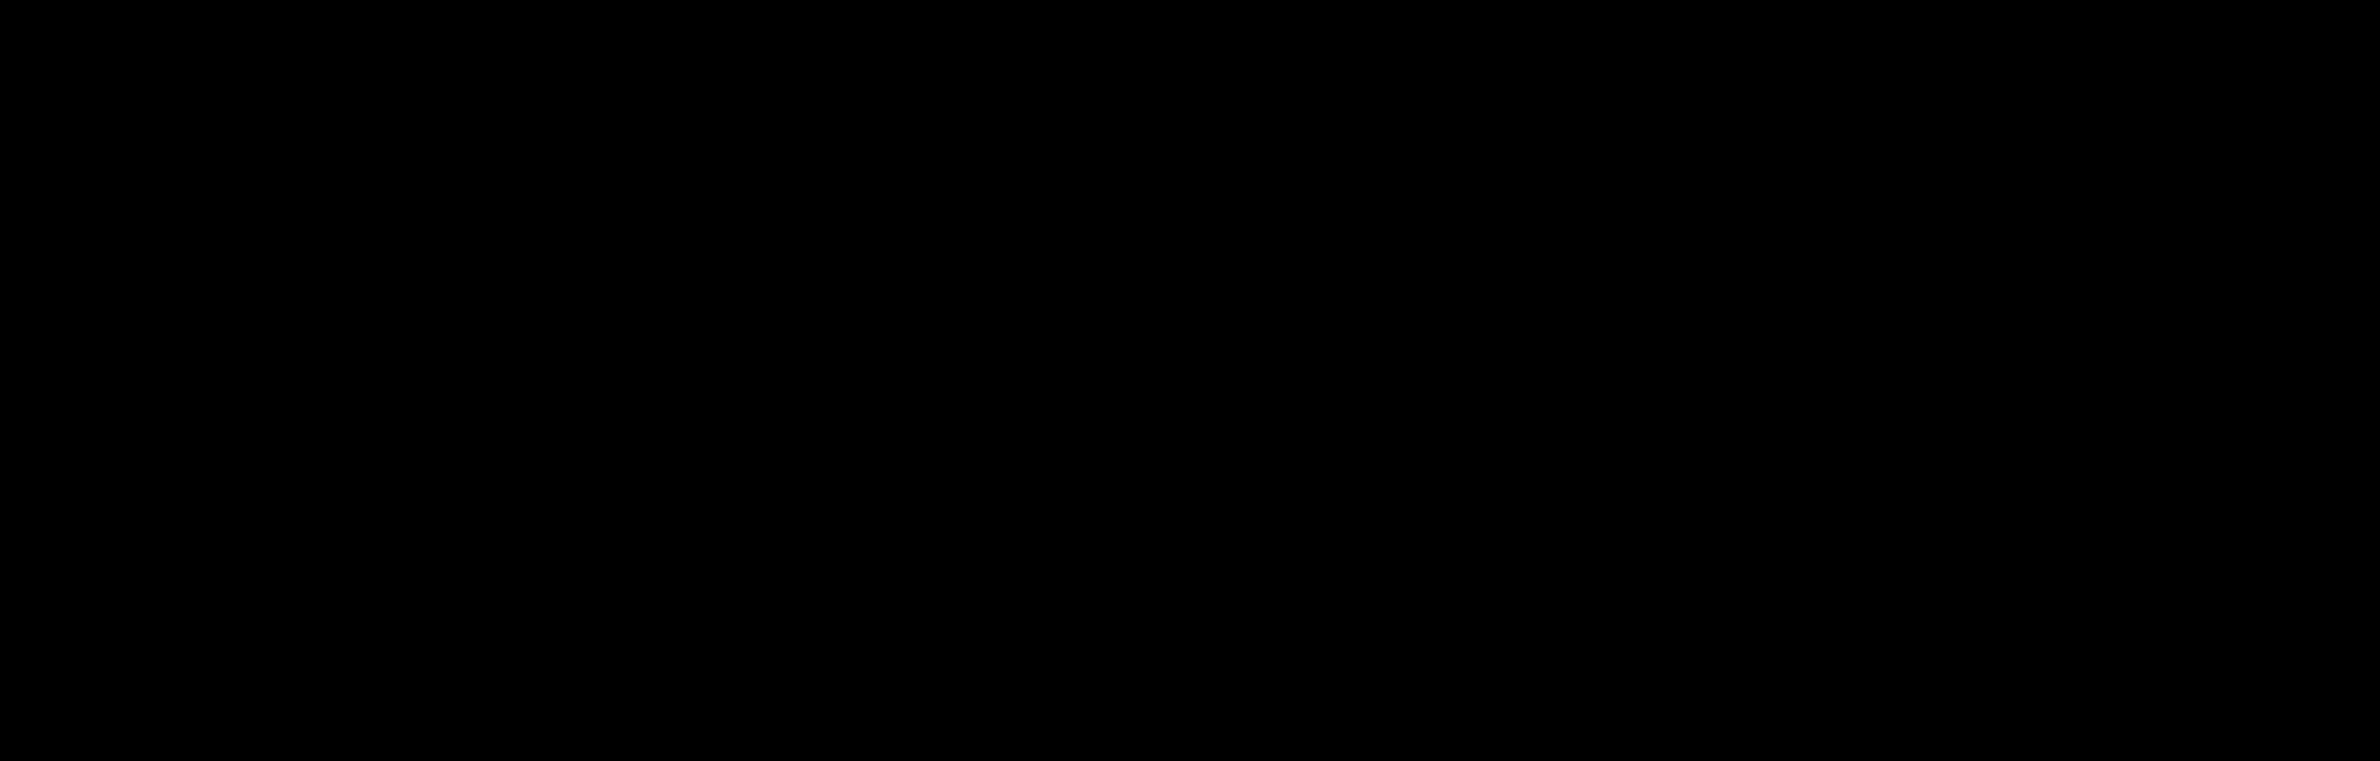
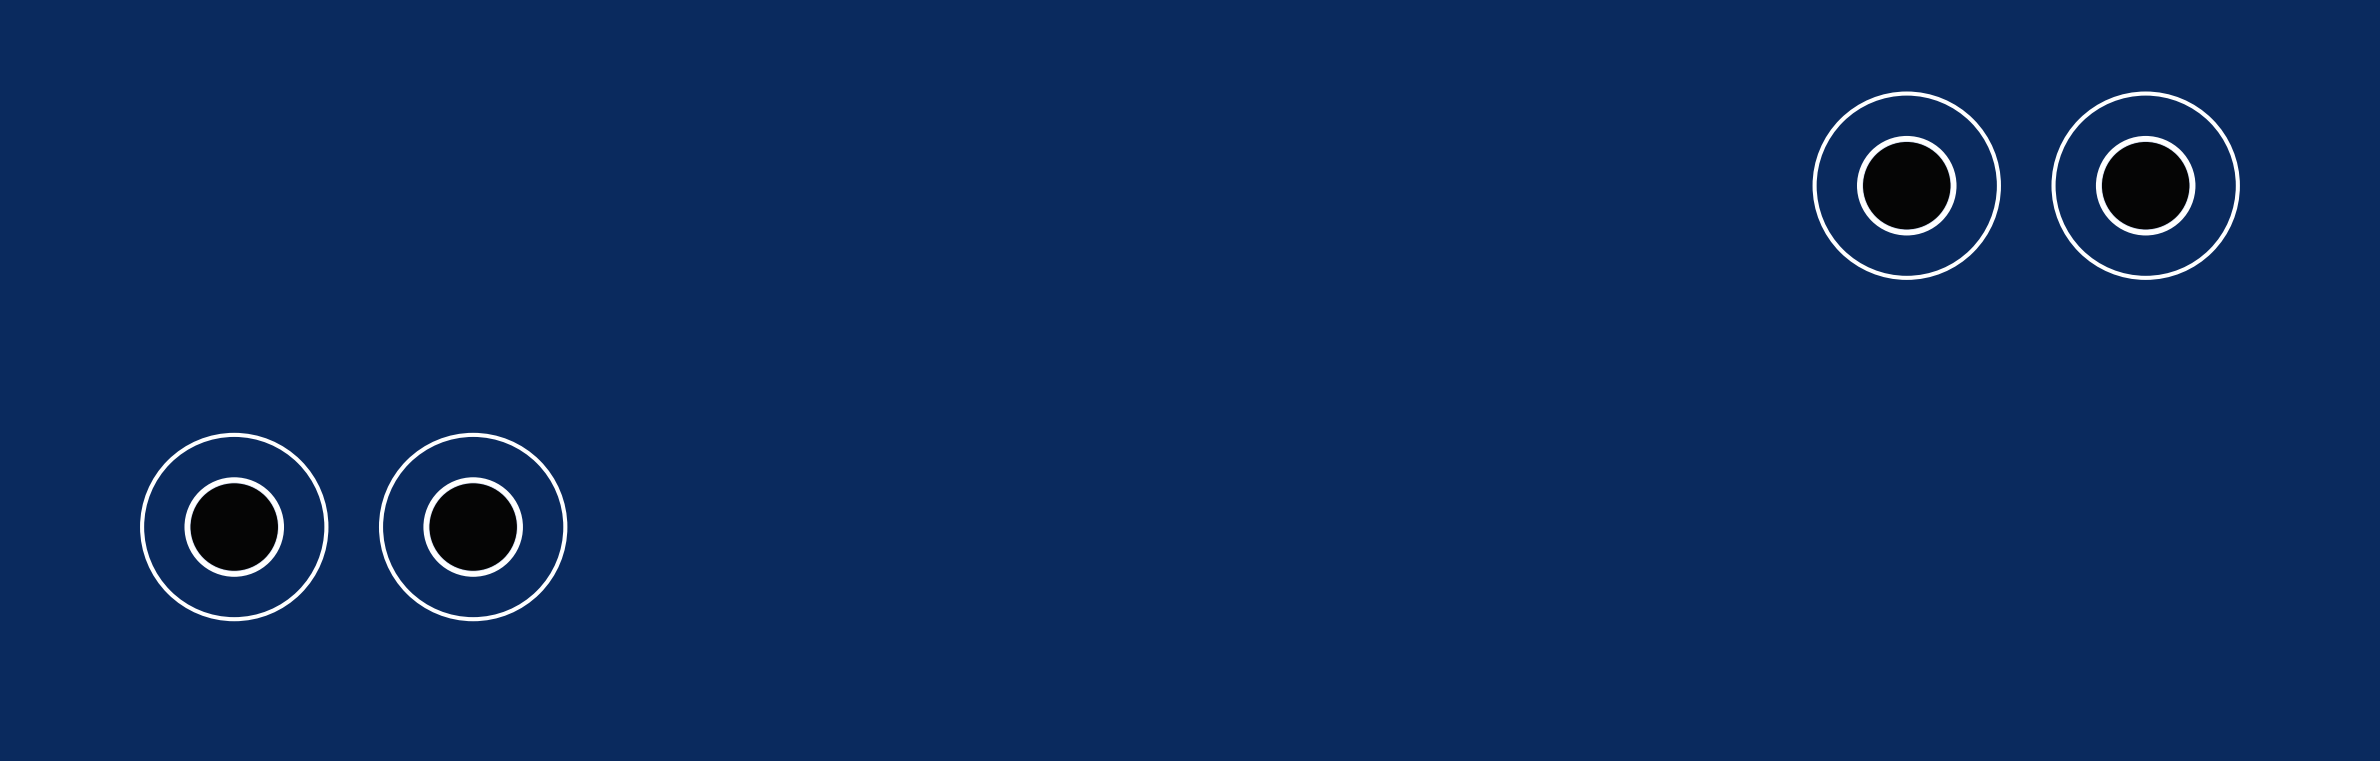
part: none -> (1906, 185)
part: none -> (2145, 185)
part: none -> (234, 527)
part: none -> (473, 527)

